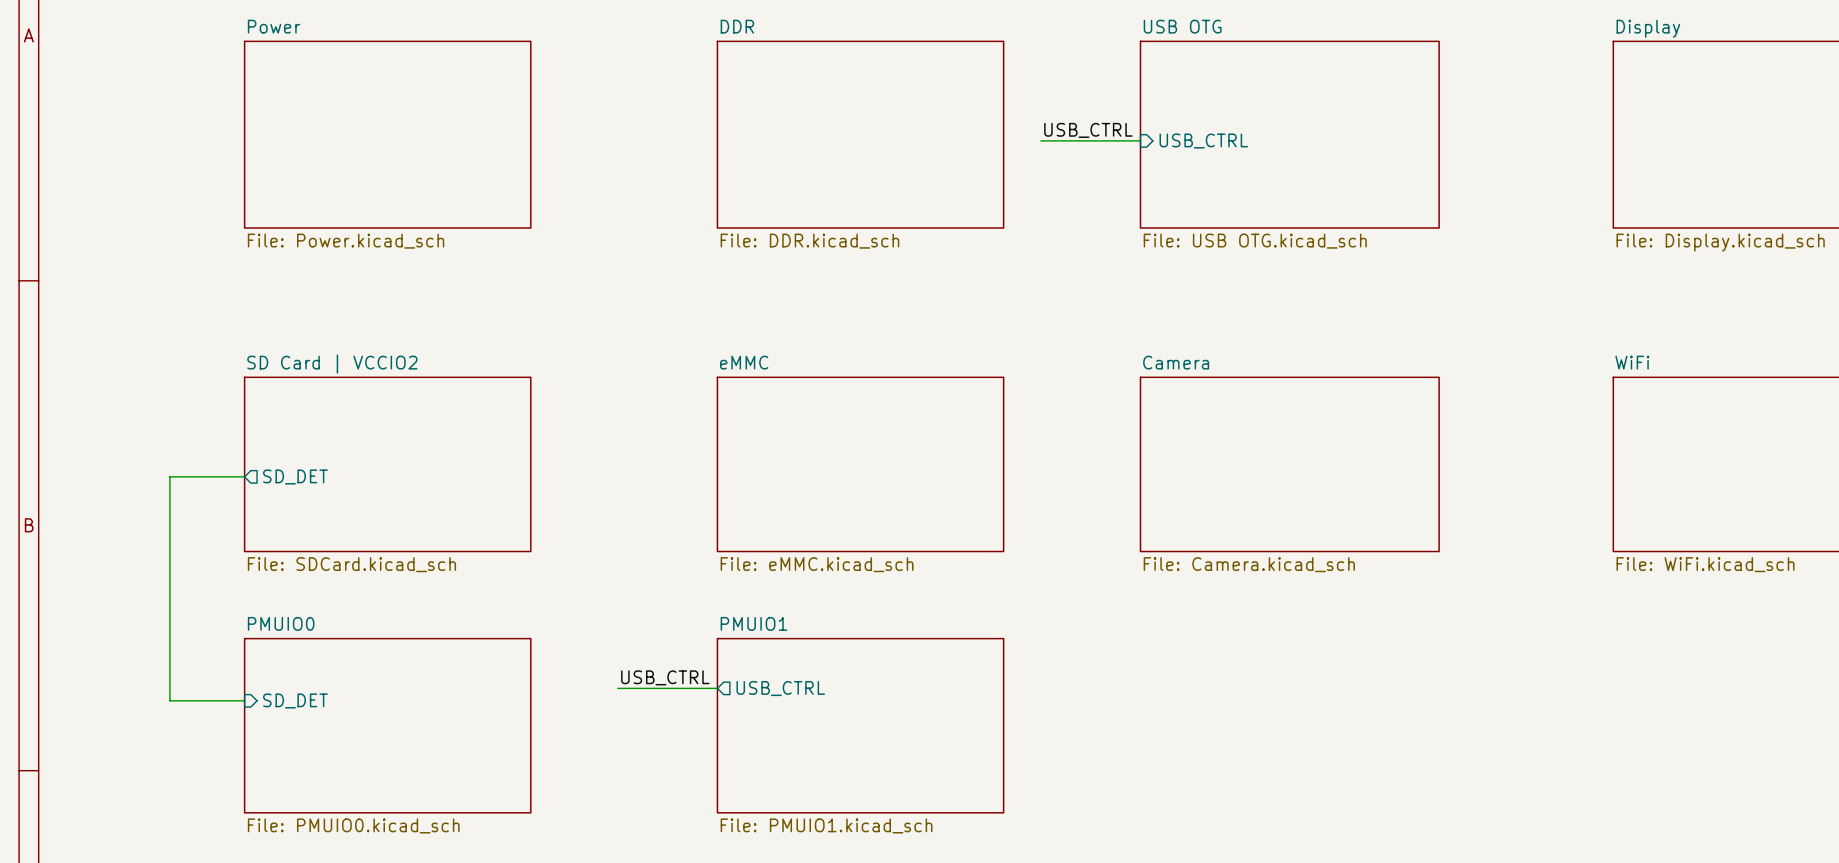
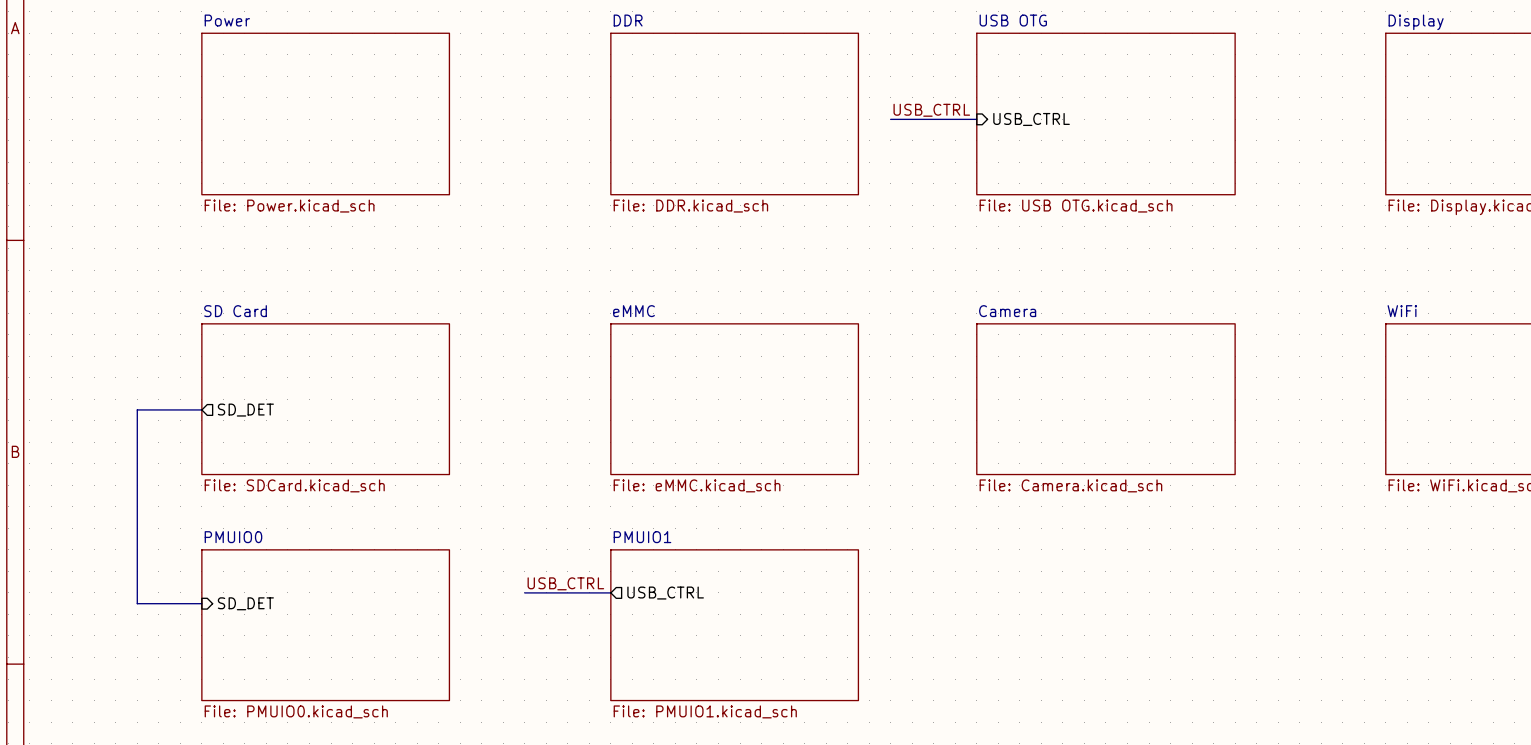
sheet SD Card | VCCIO2 name: SD Card | VCCIO2 (332, 364) -> SD Card (235, 311)

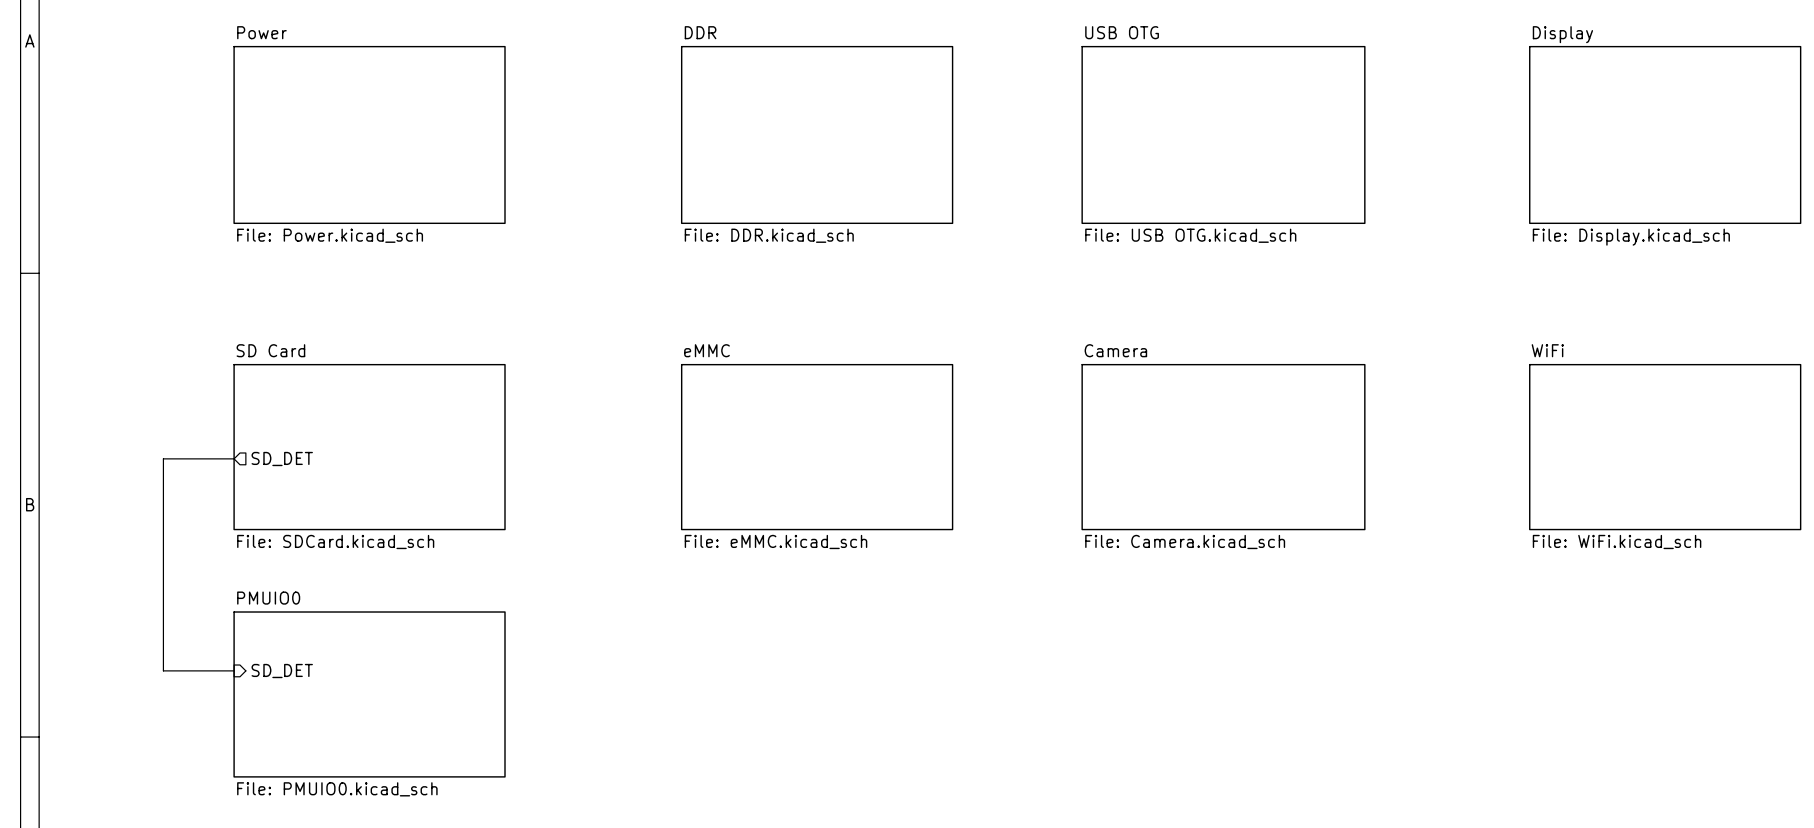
label: USB_CTRL (931, 110) -> none
wire: (890, 119) (976, 119) -> none
sheet pin: USB_CTRL (1031, 119) -> none
label: USB_CTRL (565, 583) -> none
wire: (524, 592) (610, 592) -> none
sheet pin: USB_CTRL (665, 593) -> none
sheet PMUIO1: File: PMUIO1.kicad_sch (734, 625) -> none

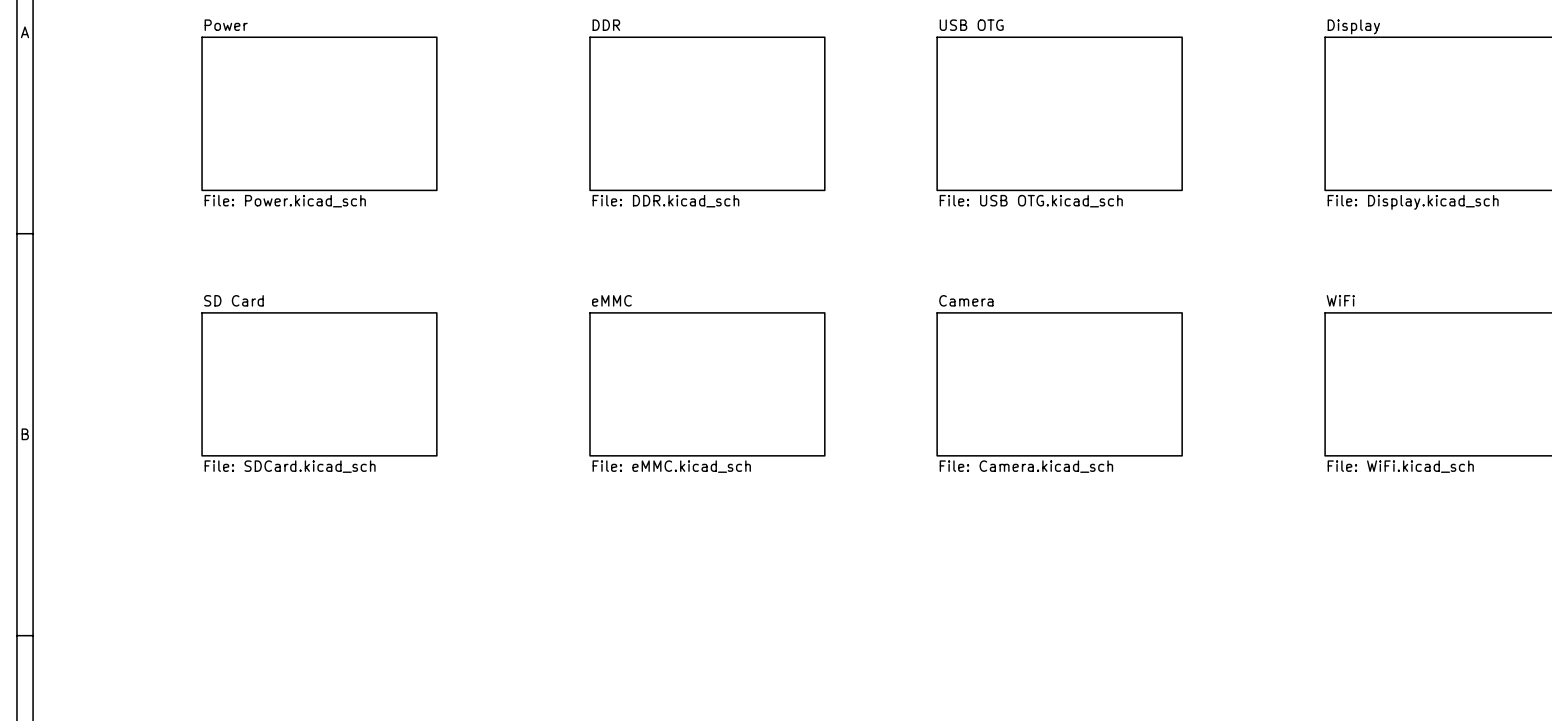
wire: (234, 458) (163, 458) (163, 670) (234, 670) -> none
sheet pin: SD_DET (282, 459) -> none
sheet pin: SD_DET (282, 671) -> none
sheet PMUIO0: File: PMUIO0.kicad_sch (369, 694) -> none

